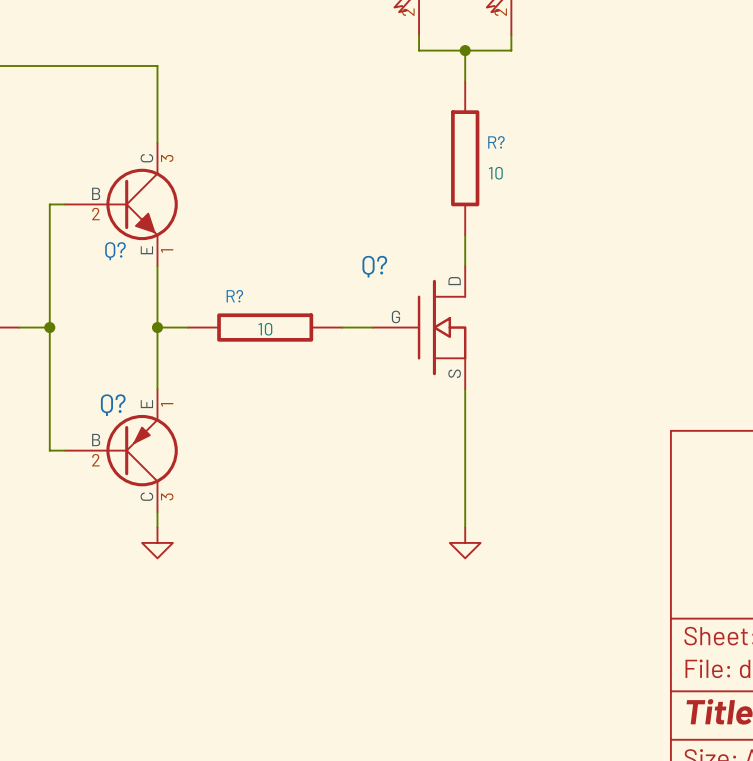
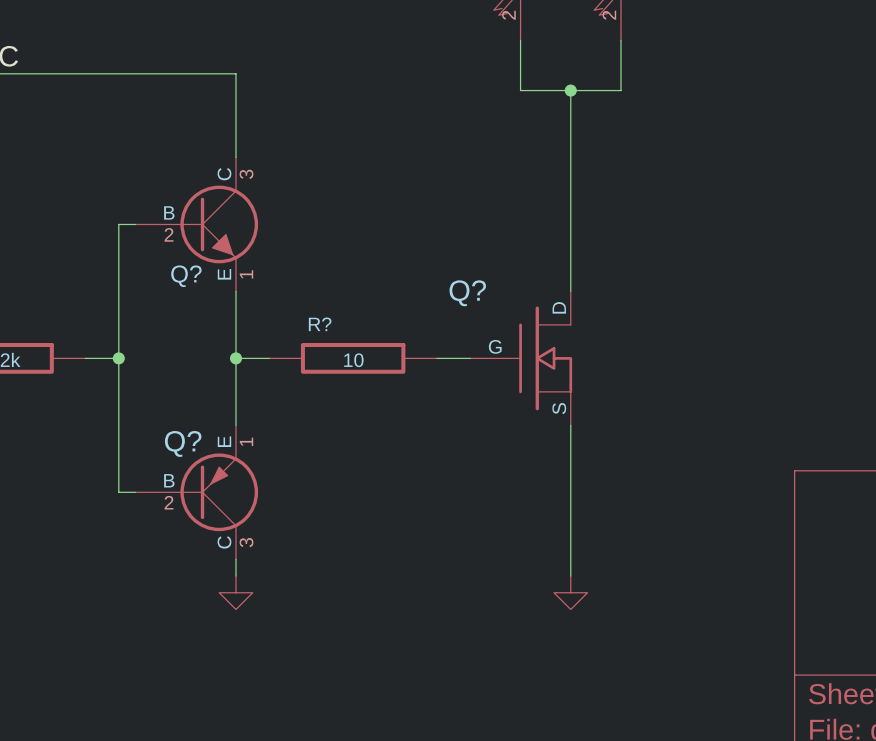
wire: (419, 50) (511, 50) -> (520, 57) (520, 90) (621, 90) (621, 57)
wire: (465, 50) (465, 81) -> (570, 257) (570, 90)
junction position: (465, 50) -> (570, 90)
R?: 10 (465, 158) -> none

